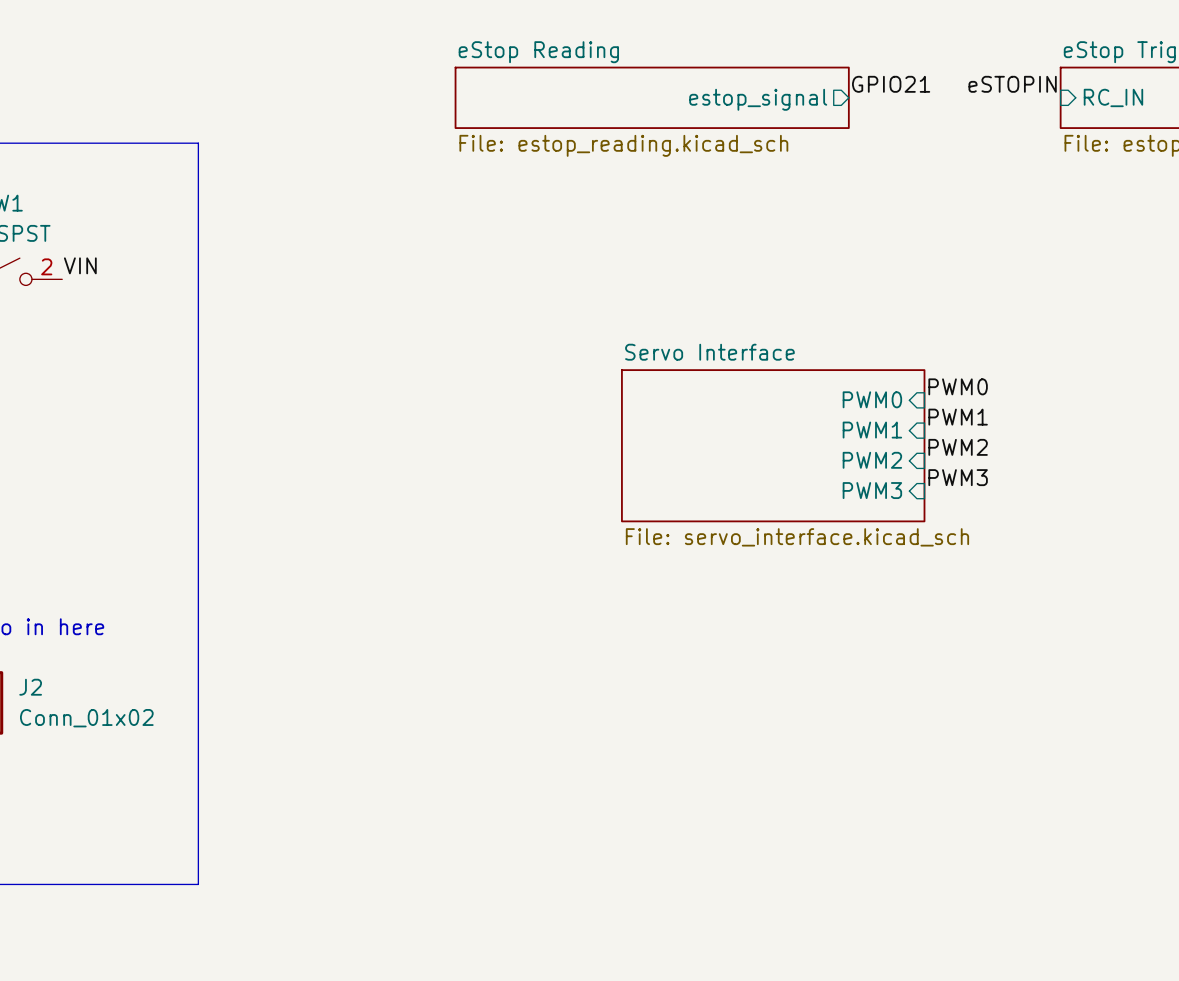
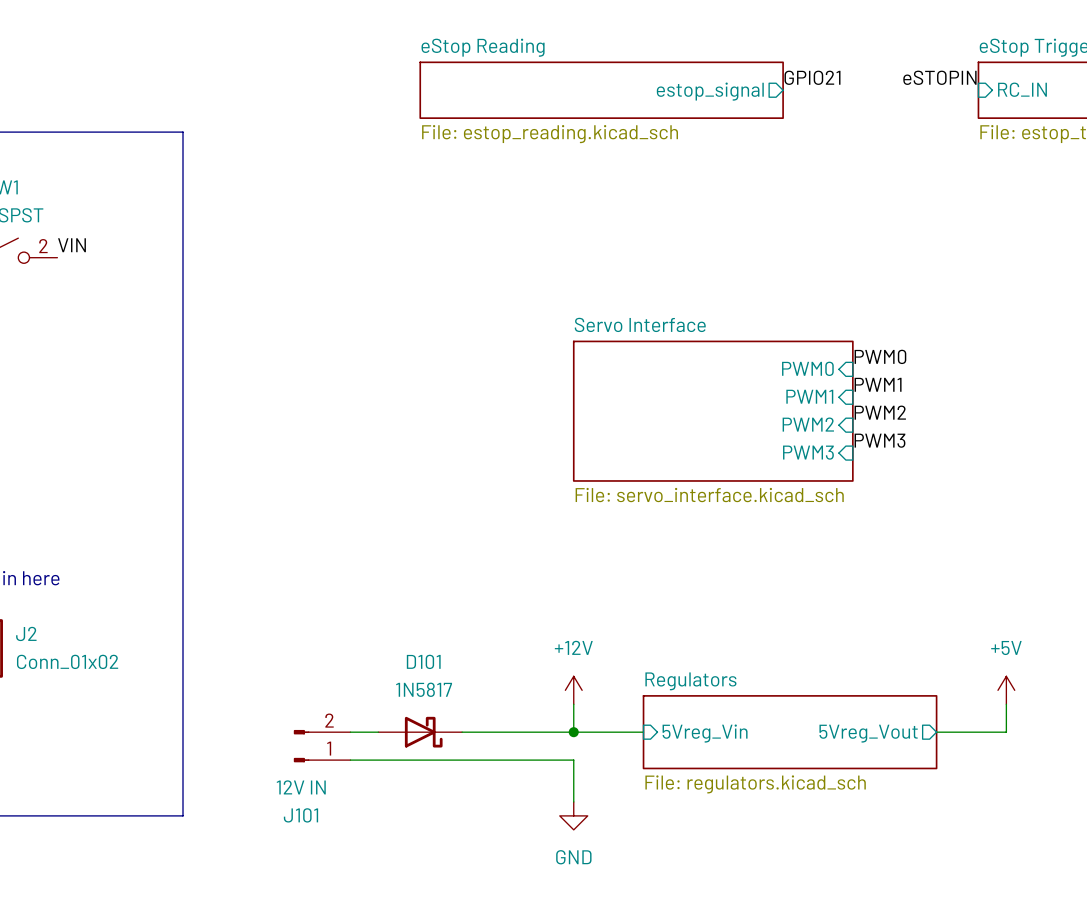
power symbol: none -> +12V (573, 690)
power symbol: none -> +5V (1006, 690)
wire: none -> (573, 704) (573, 732)
wire: none -> (1006, 704) (1006, 732) (936, 732)
wire: none -> (350, 732) (378, 732)
D101: none -> 1N5817 (420, 732)
wire: none -> (462, 732) (643, 732)
junction: none -> (573, 732)
sheet Regulators: none -> File: regulators.kicad_sch (790, 732)
sheet pin: none -> 5Vreg_Vin (705, 733)
sheet pin: none -> 5Vreg_Vout (868, 733)
J101: none -> 12V IN (322, 746)
wire: none -> (350, 760) (573, 760) (573, 801)
power symbol: none -> GND (573, 815)

